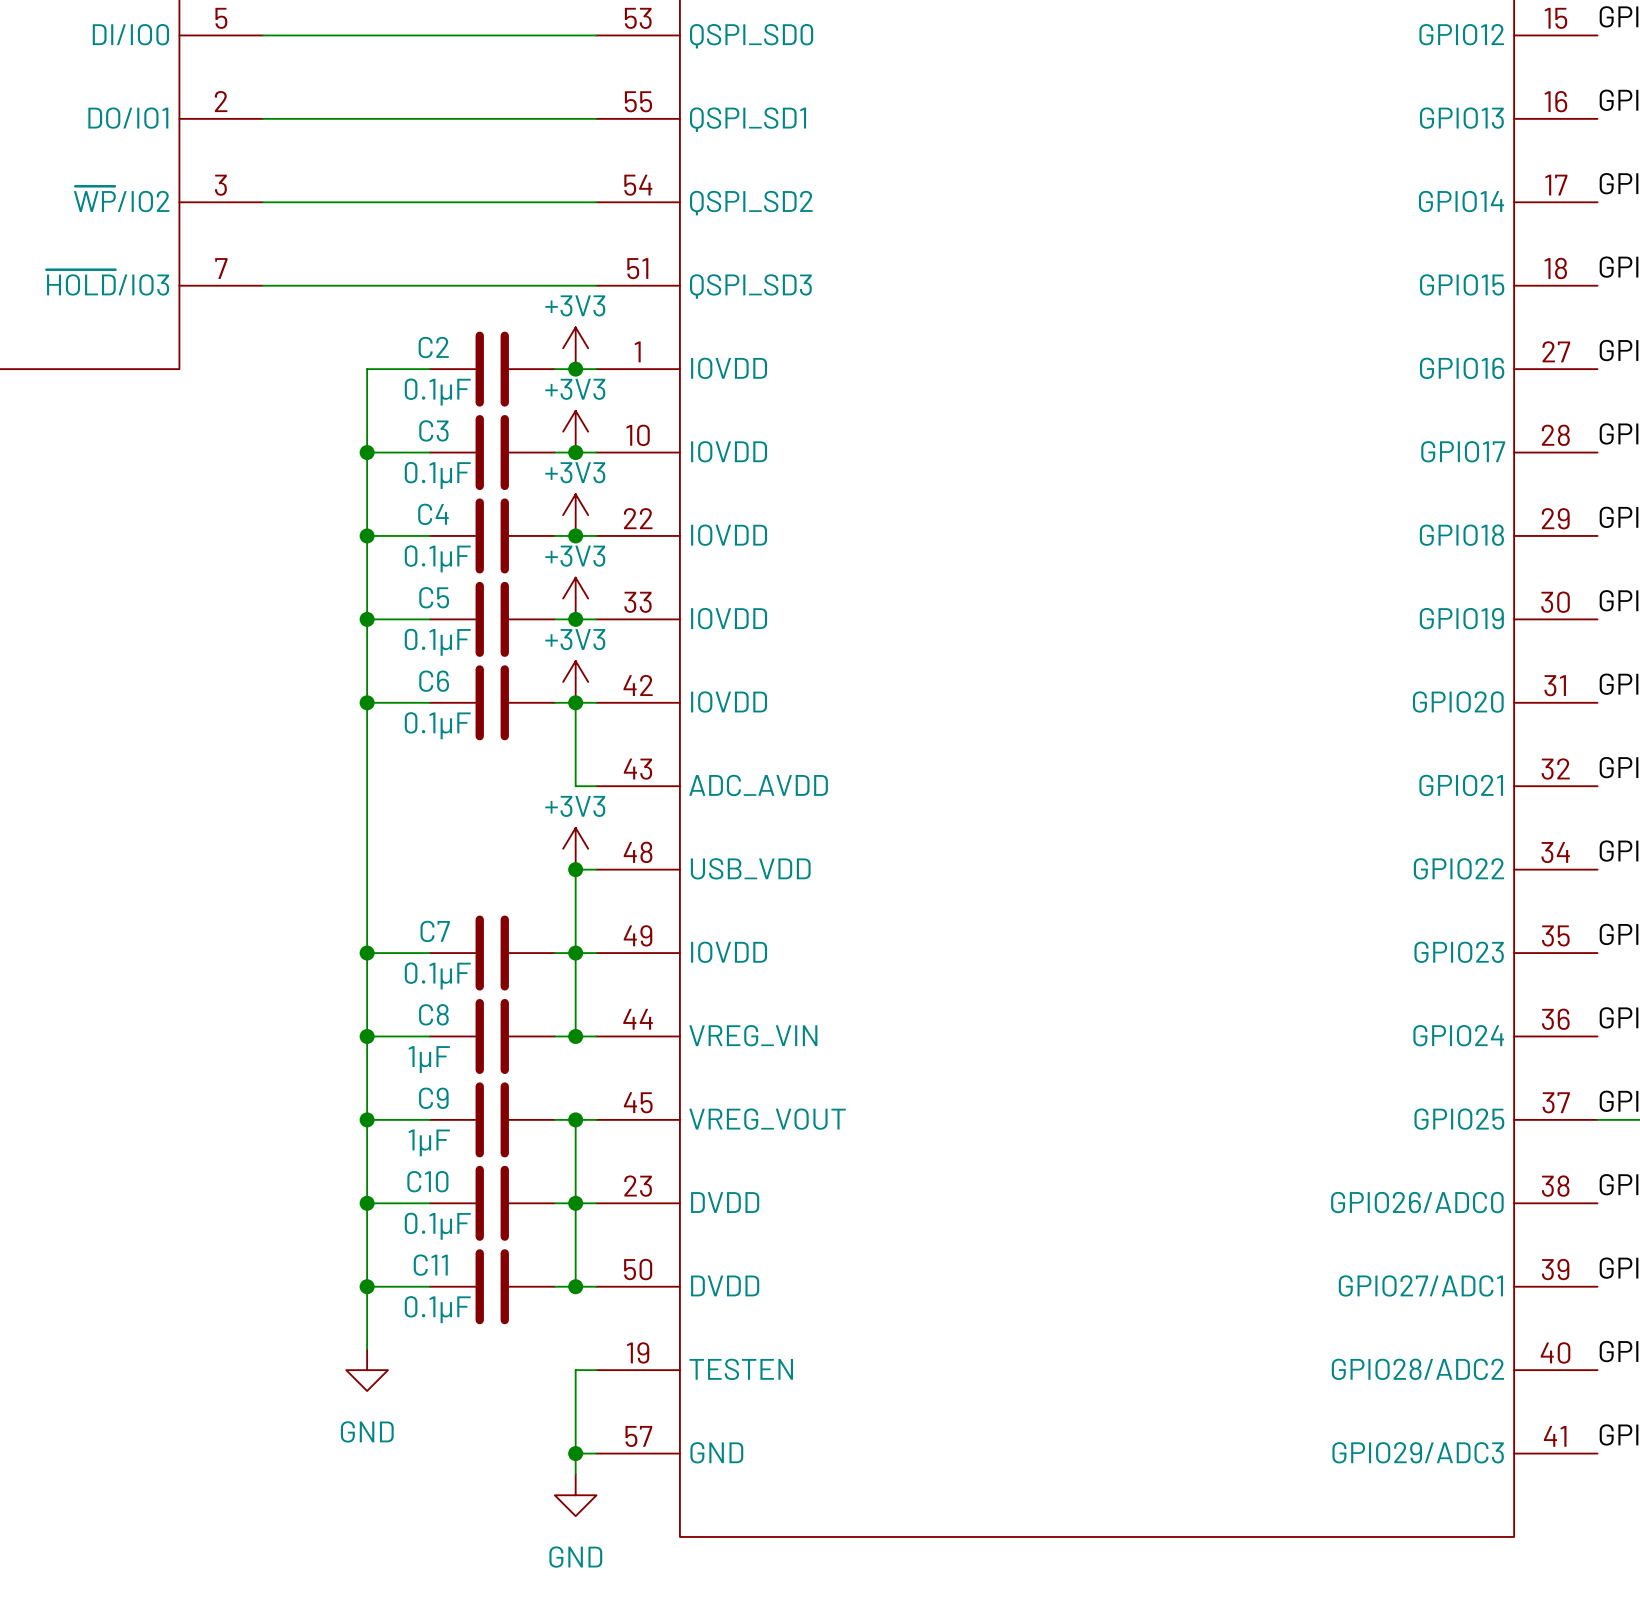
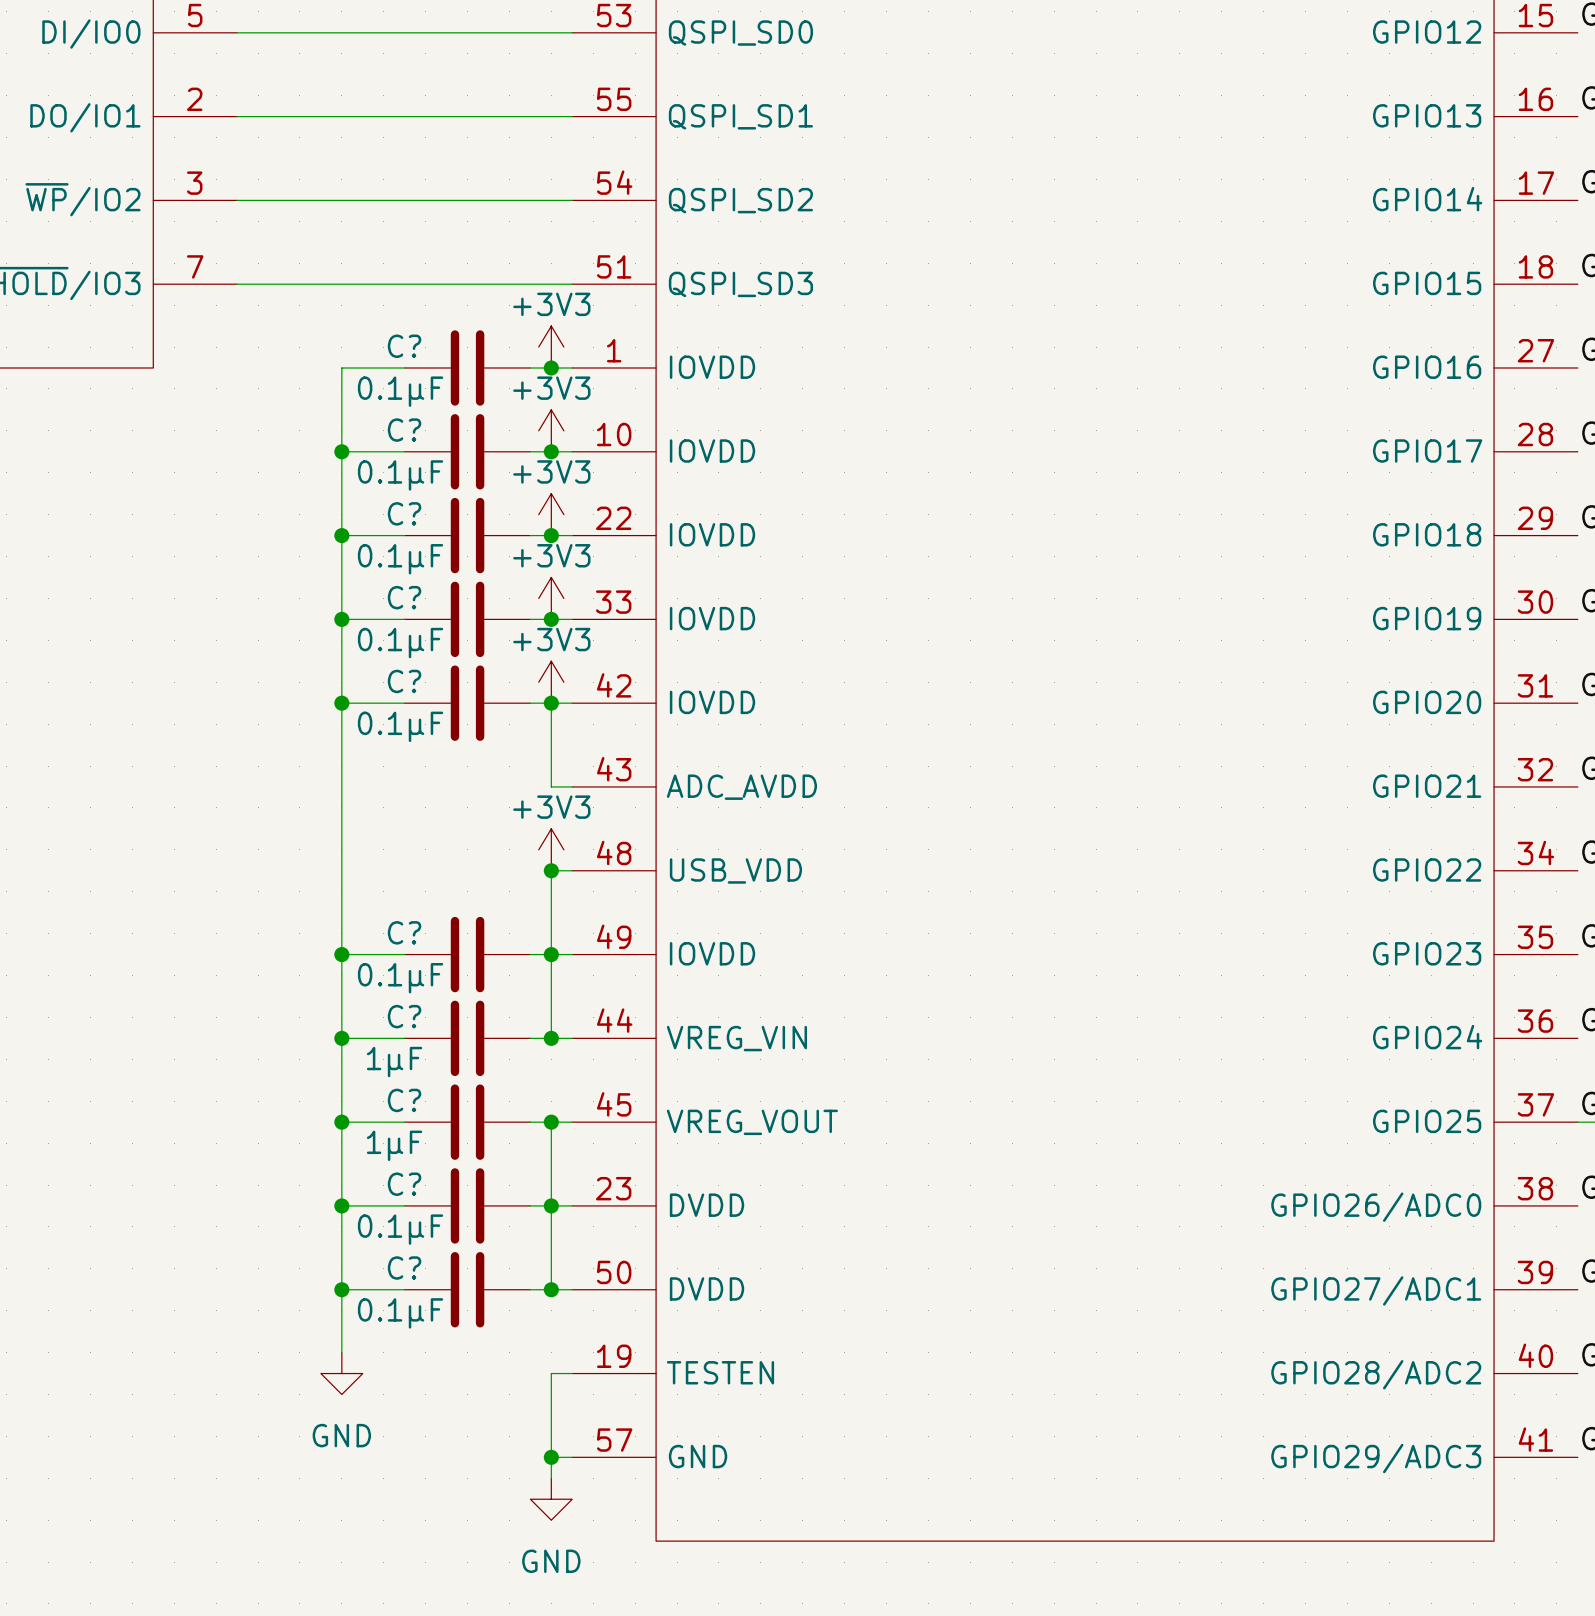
C2 name: C2 (433, 347) -> C? (404, 346)
C3 name: C3 (433, 430) -> C? (404, 430)
C4 name: C4 (433, 514) -> C? (404, 513)
C5 name: C5 (434, 597) -> C? (404, 597)
C6 name: C6 (434, 681) -> C? (404, 681)
C7 name: C7 (435, 931) -> C? (404, 932)
C8 name: C8 (433, 1014) -> C? (404, 1016)
C9 name: C9 (433, 1098) -> C? (404, 1100)
C10 name: C10 (427, 1181) -> C? (404, 1184)
C11 name: C11 (430, 1265) -> C? (404, 1268)

